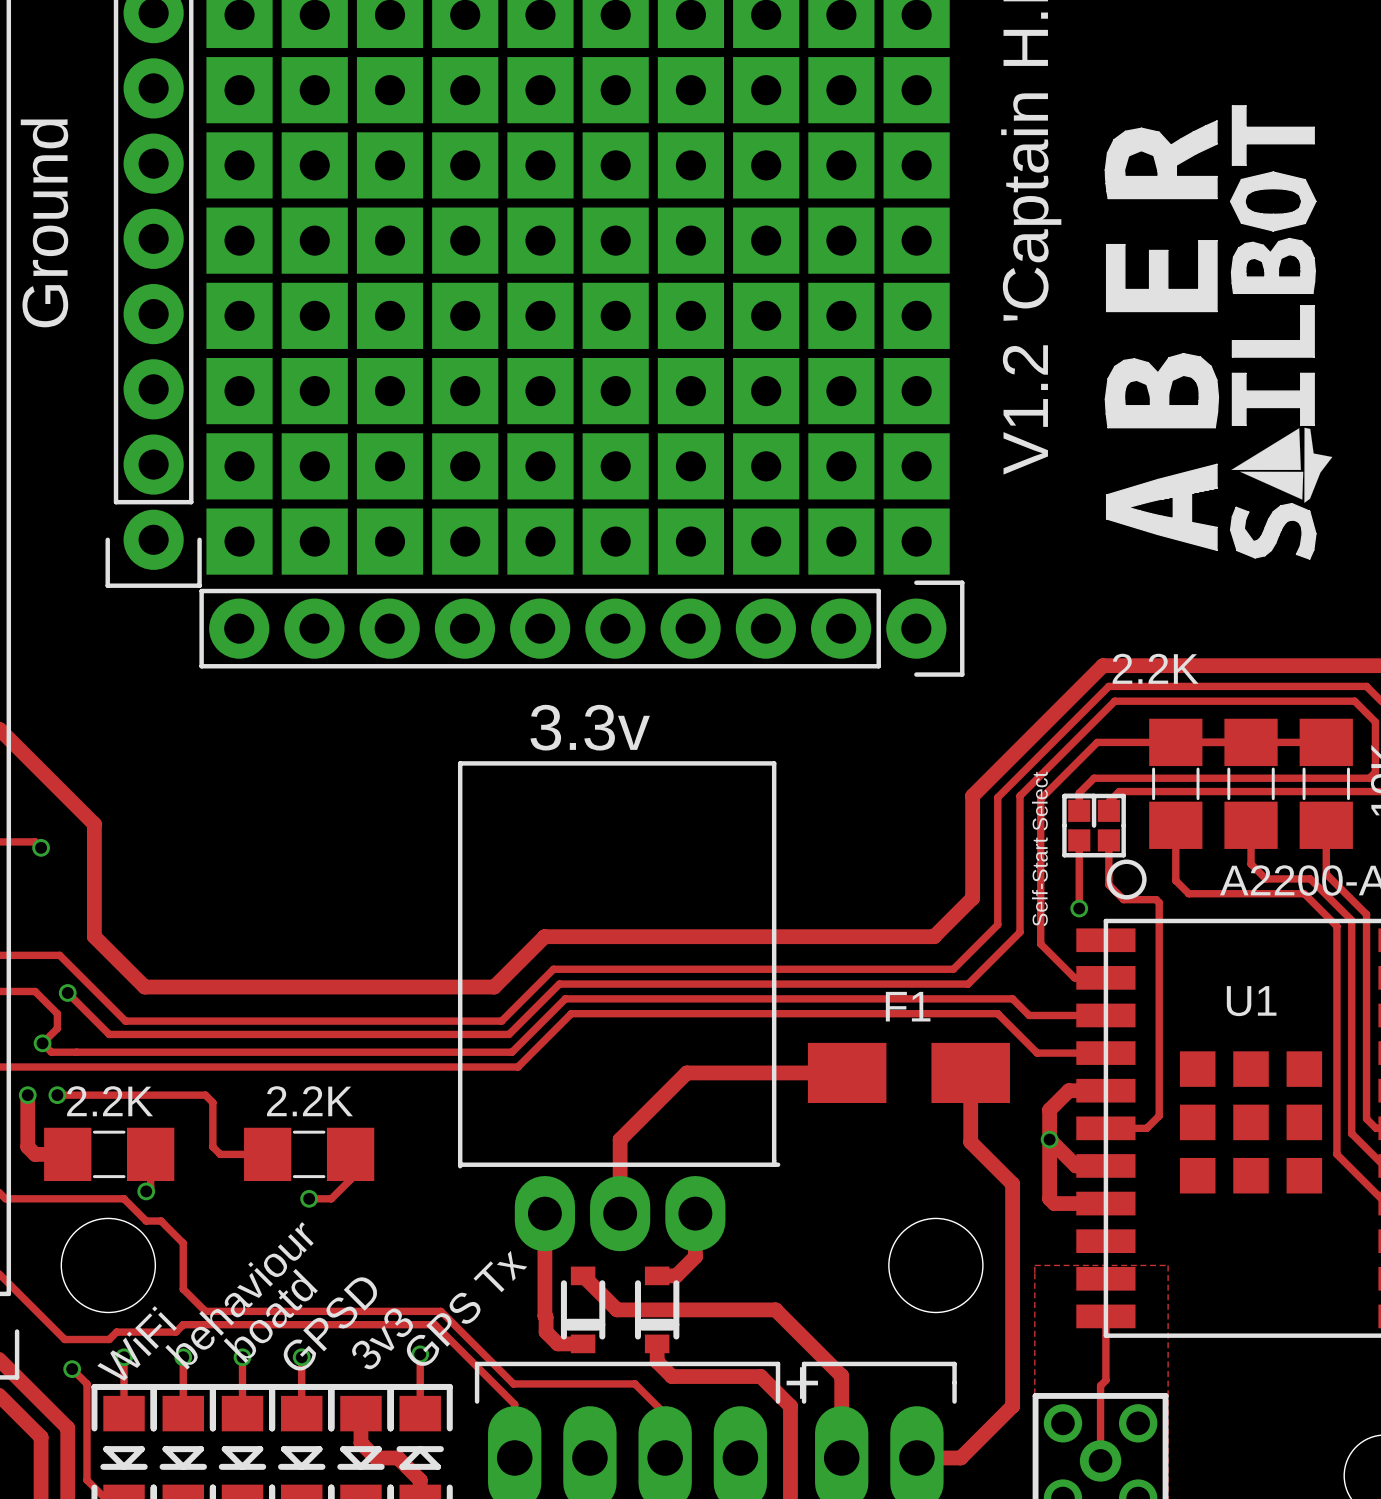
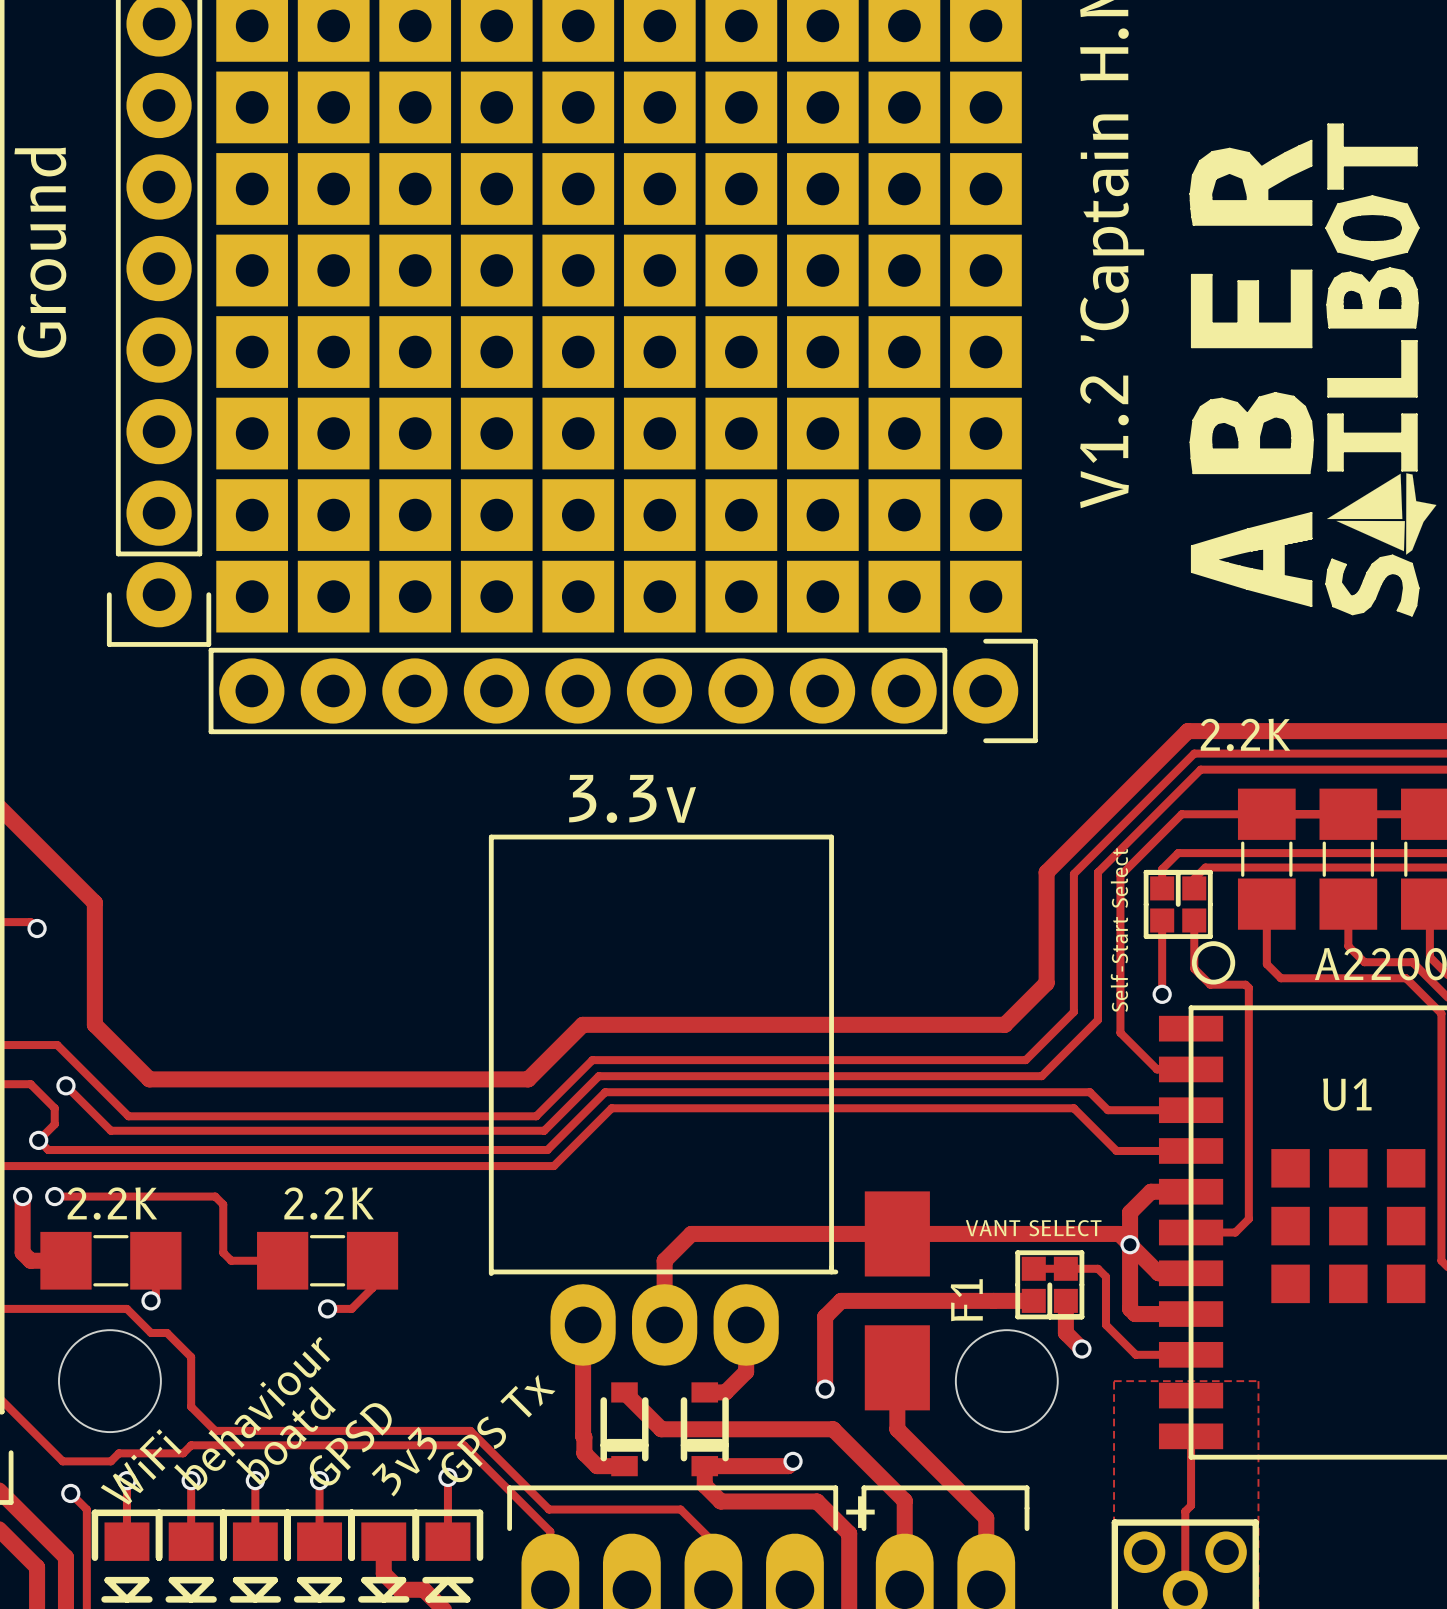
track: (847, 1072) (686, 1072) (620, 1139) (620, 1154) -> (1130, 1244) (1119, 1233) (691, 1233) (664, 1260)
F1 rotation: 0° (908, 1072) -> 90° clockwise (897, 1300)
F1 position: (908, 1072) -> (897, 1300)
track: (970, 1072) (970, 1142) (1012, 1184) (1012, 1406) (960, 1457) (916, 1457) -> (897, 1367) (897, 1429) (986, 1518) (986, 1589)
track: none -> (1033, 1268) (1097, 1268) (1106, 1276) (1106, 1324) (1135, 1354) (1191, 1354)
part: none -> (1049, 1284)
track: none -> (1033, 1300) (841, 1300) (825, 1316) (825, 1389)
track: none -> (1065, 1300) (1065, 1332) (1081, 1349)
via: none -> (1081, 1349)
via: none -> (825, 1389)
track: none -> (793, 1461) (788, 1466) (704, 1466)
via: none -> (793, 1461)

